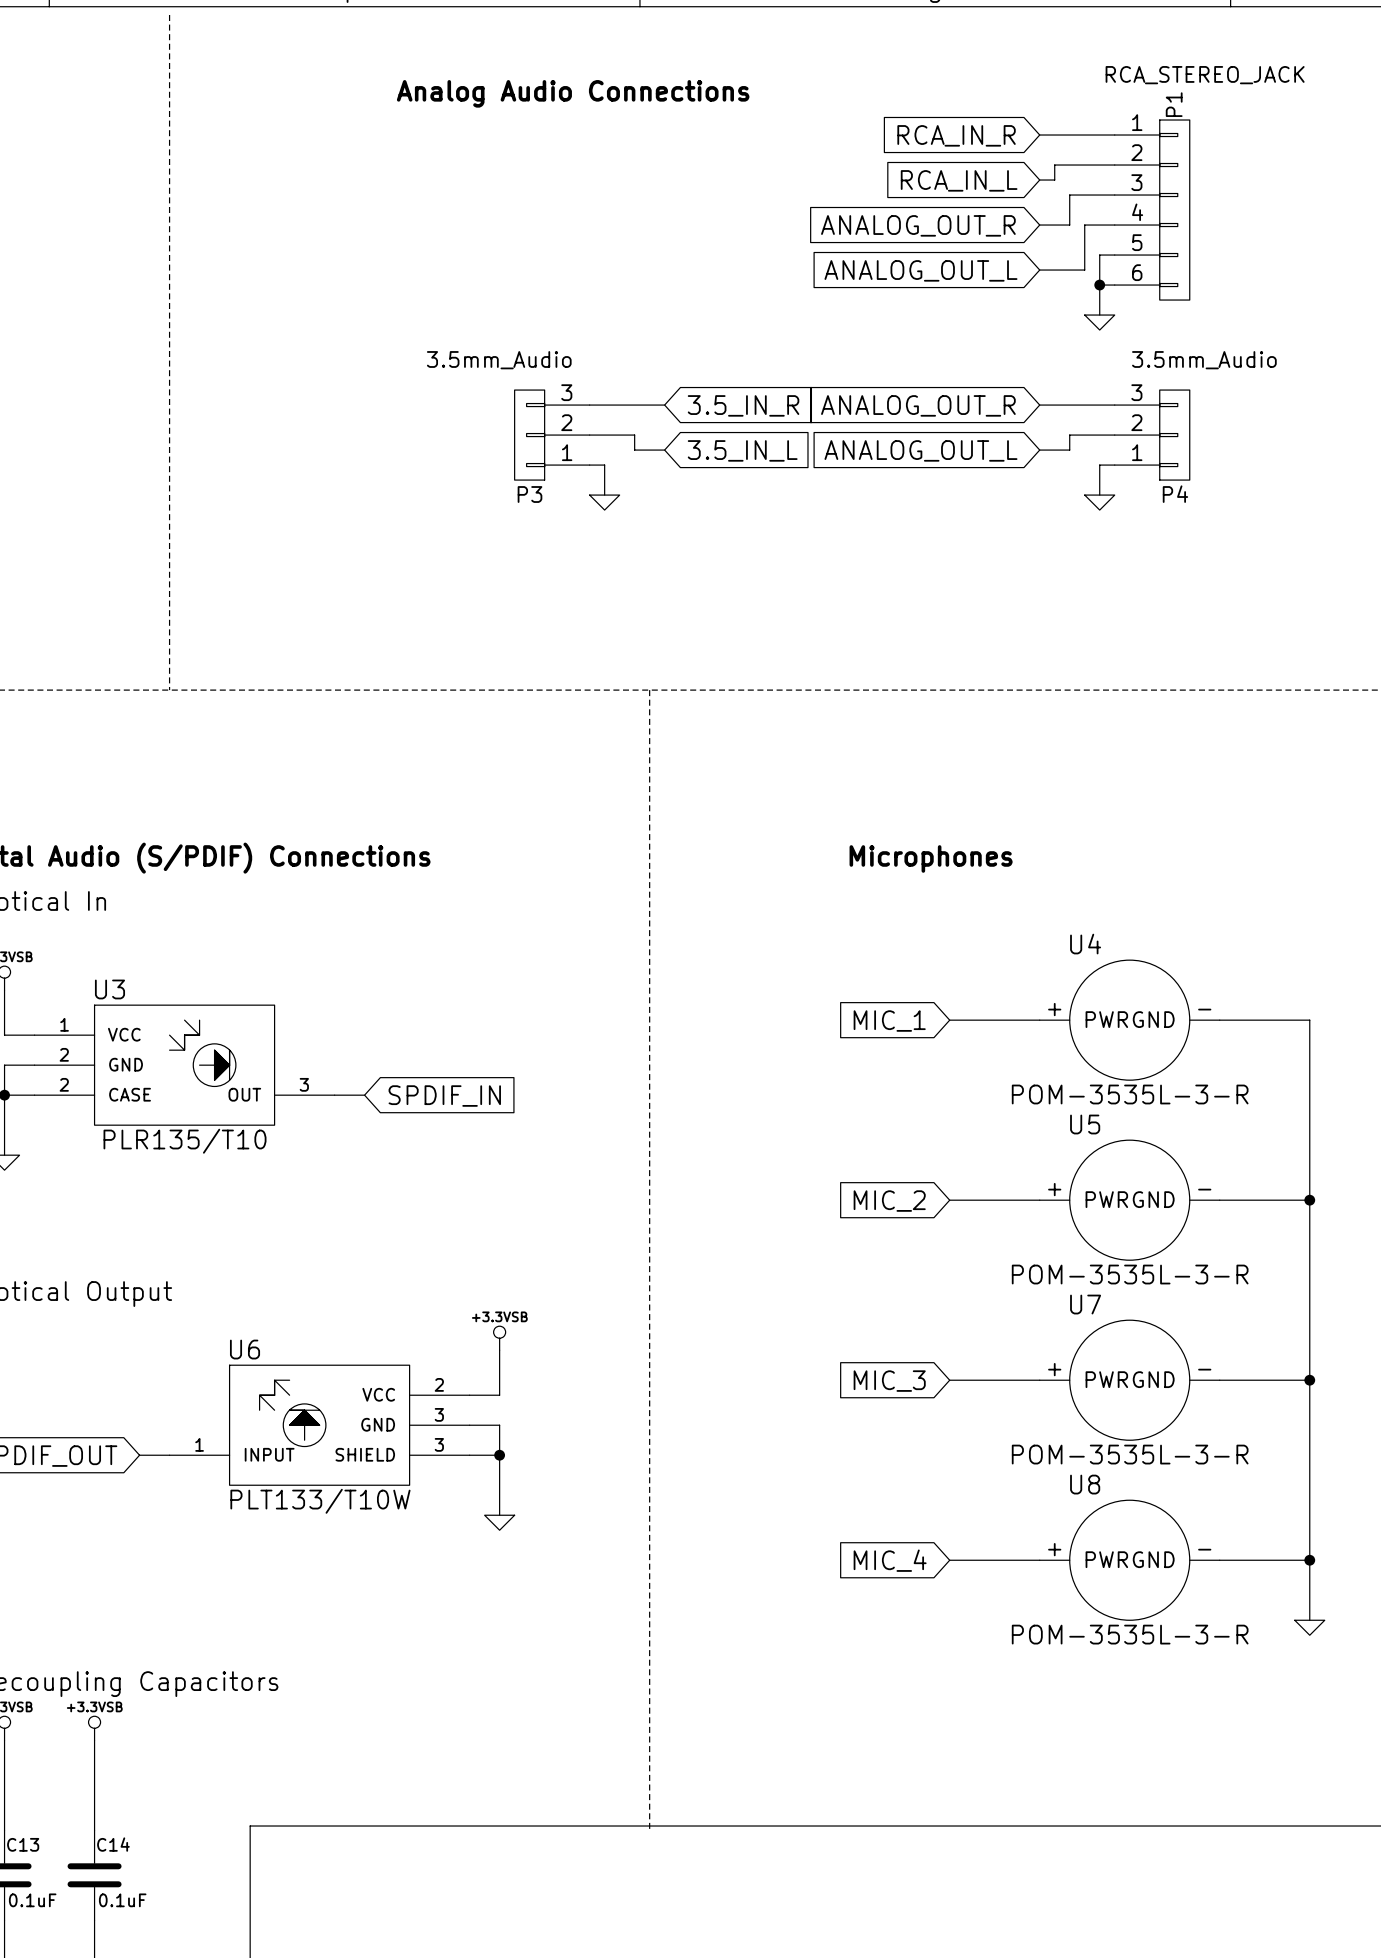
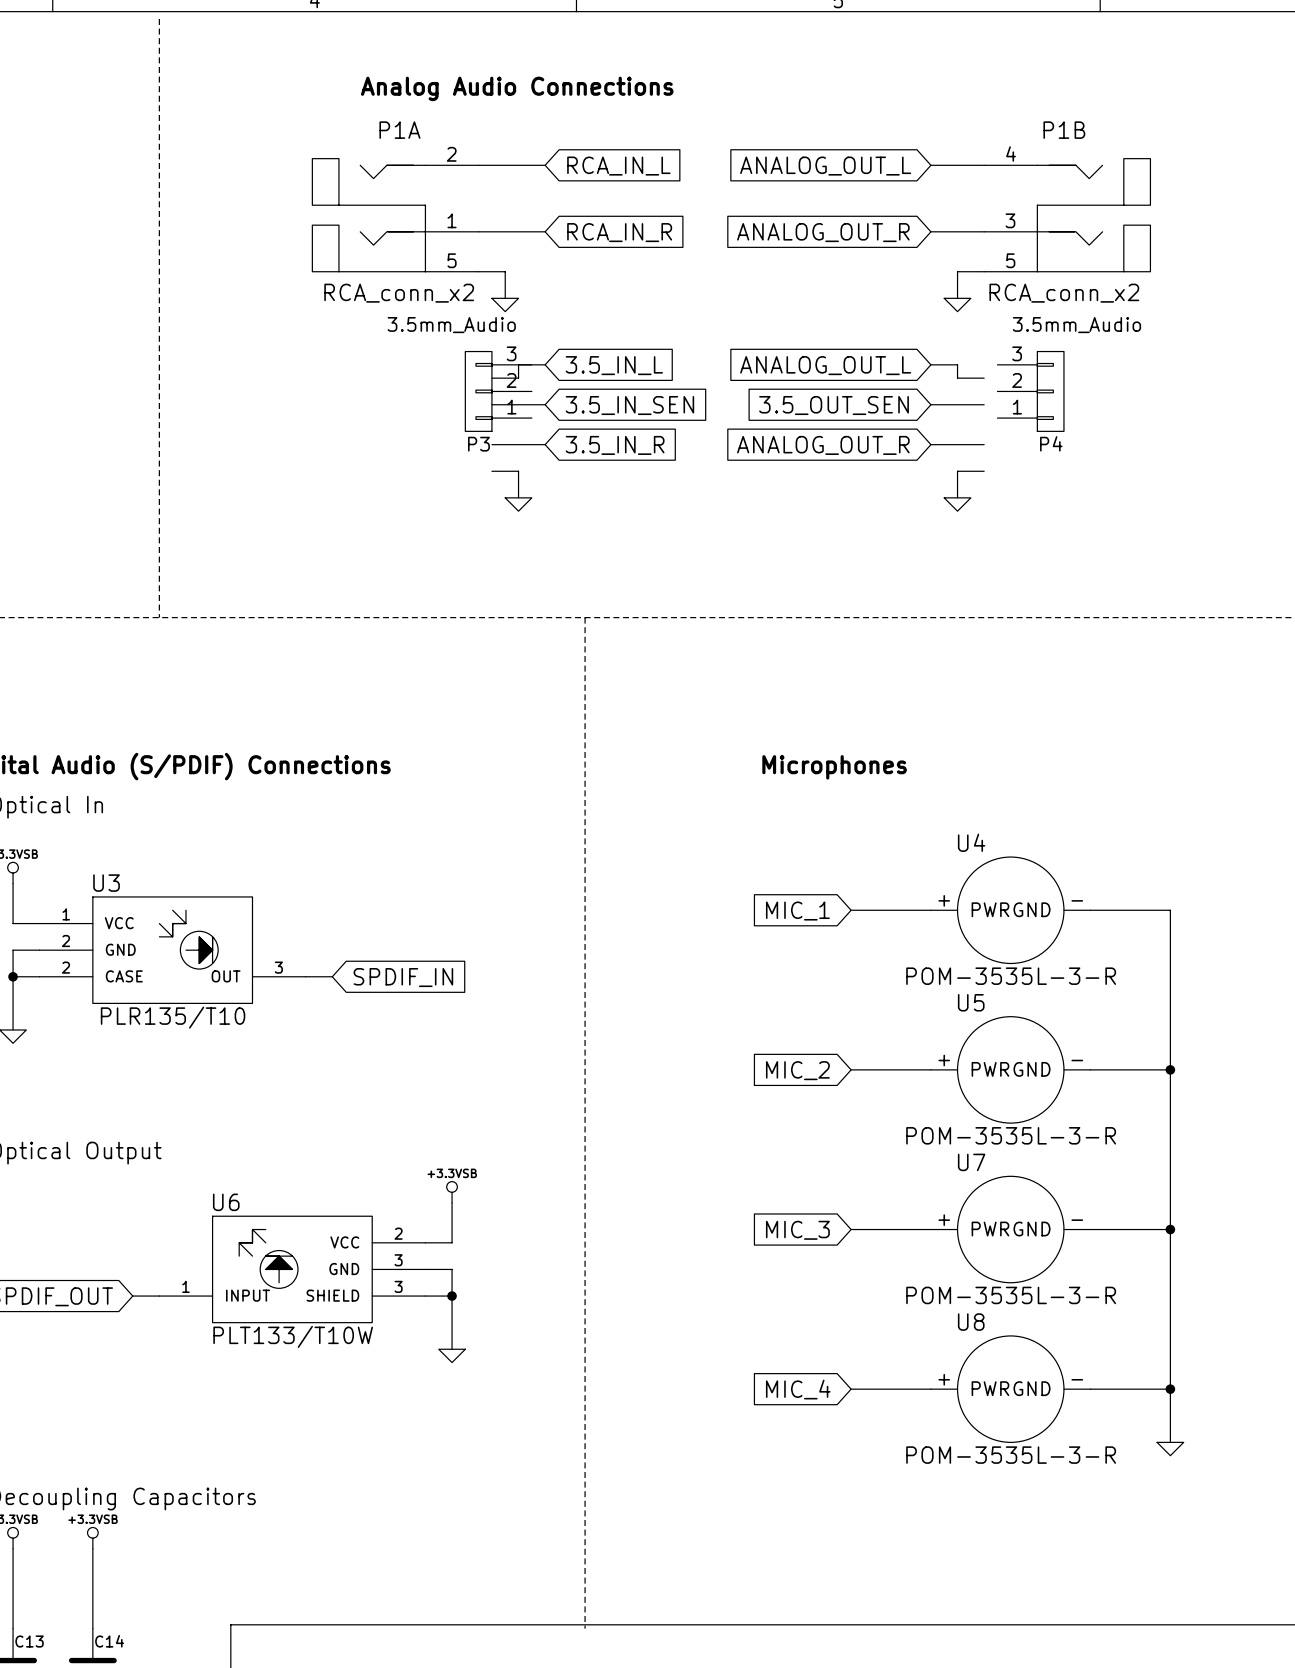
global label: RCA_IN_R (956, 135) -> none
wire: (1039, 135) (1114, 135) -> none
wire: (1114, 165) (1054, 165) (1054, 180) -> (984, 165) (944, 165)
wire: none -> (478, 165) (545, 165)
global label: none -> RCA_IN_L (618, 166)
global label: RCA_IN_L (959, 180) -> ANALOG_OUT_L (825, 166)
wire: (1114, 195) (1069, 195) (1069, 225) (1039, 225) -> none
P1: RCA_STEREO_JACK (1152, 210) -> none
global label position: ANALOG_OUT_R (918, 225) -> ANALOG_OUT_R (823, 232)
wire: (1114, 225) (1084, 225) (1084, 270) (1039, 270) -> none
P1A: none -> RCA_conn_x2 (395, 215)
P1B: none -> RCA_conn_x2 (1067, 215)
wire: none -> (478, 231) (545, 231)
global label: none -> RCA_IN_R (619, 232)
wire: none -> (930, 231) (984, 231)
wire: (1114, 255) (1099, 255) (1099, 315) -> none
global label: ANALOG_OUT_L (920, 270) -> none
wire: (1099, 285) (1114, 285) -> none
junction: (1099, 285) -> none
wire: none -> (478, 271) (505, 271) (505, 298)
wire: none -> (984, 271) (957, 271) (957, 298)
power symbol position: (1099, 322) -> (957, 304)
power symbol: none -> (505, 304)
wire: none -> (531, 364) (518, 364) (518, 378) (491, 378)
wire: (604, 405) (664, 405) -> (491, 404) (545, 404)
global label position: 3.5_IN_R (743, 405) -> 3.5_IN_R (615, 445)
global label: ANALOG_OUT_R (918, 405) -> ANALOG_OUT_L (825, 365)
wire: (1069, 405) (1114, 405) -> (957, 364) (957, 378) (984, 378)
wire: (589, 435) (634, 435) (634, 450) (664, 450) -> none
wire: (1114, 435) (1069, 435) (1069, 450) -> (984, 404) (957, 404)
global label: none -> 3.5_IN_SEN (629, 405)
global label position: 3.5_IN_L (742, 450) -> 3.5_IN_L (614, 365)
global label: ANALOG_OUT_L (920, 450) -> 3.5_OUT_SEN (834, 405)
wire: (589, 465) (604, 465) (604, 495) -> (491, 444) (545, 444)
wire: (1114, 465) (1099, 465) (1099, 495) -> (930, 444) (984, 444)
global label: none -> ANALOG_OUT_R (823, 445)
power symbol position: (604, 502) -> (518, 504)
power symbol position: (1099, 502) -> (957, 504)
wire: none -> (491, 471) (518, 471) (518, 497)
wire: none -> (984, 471) (957, 471) (957, 497)

